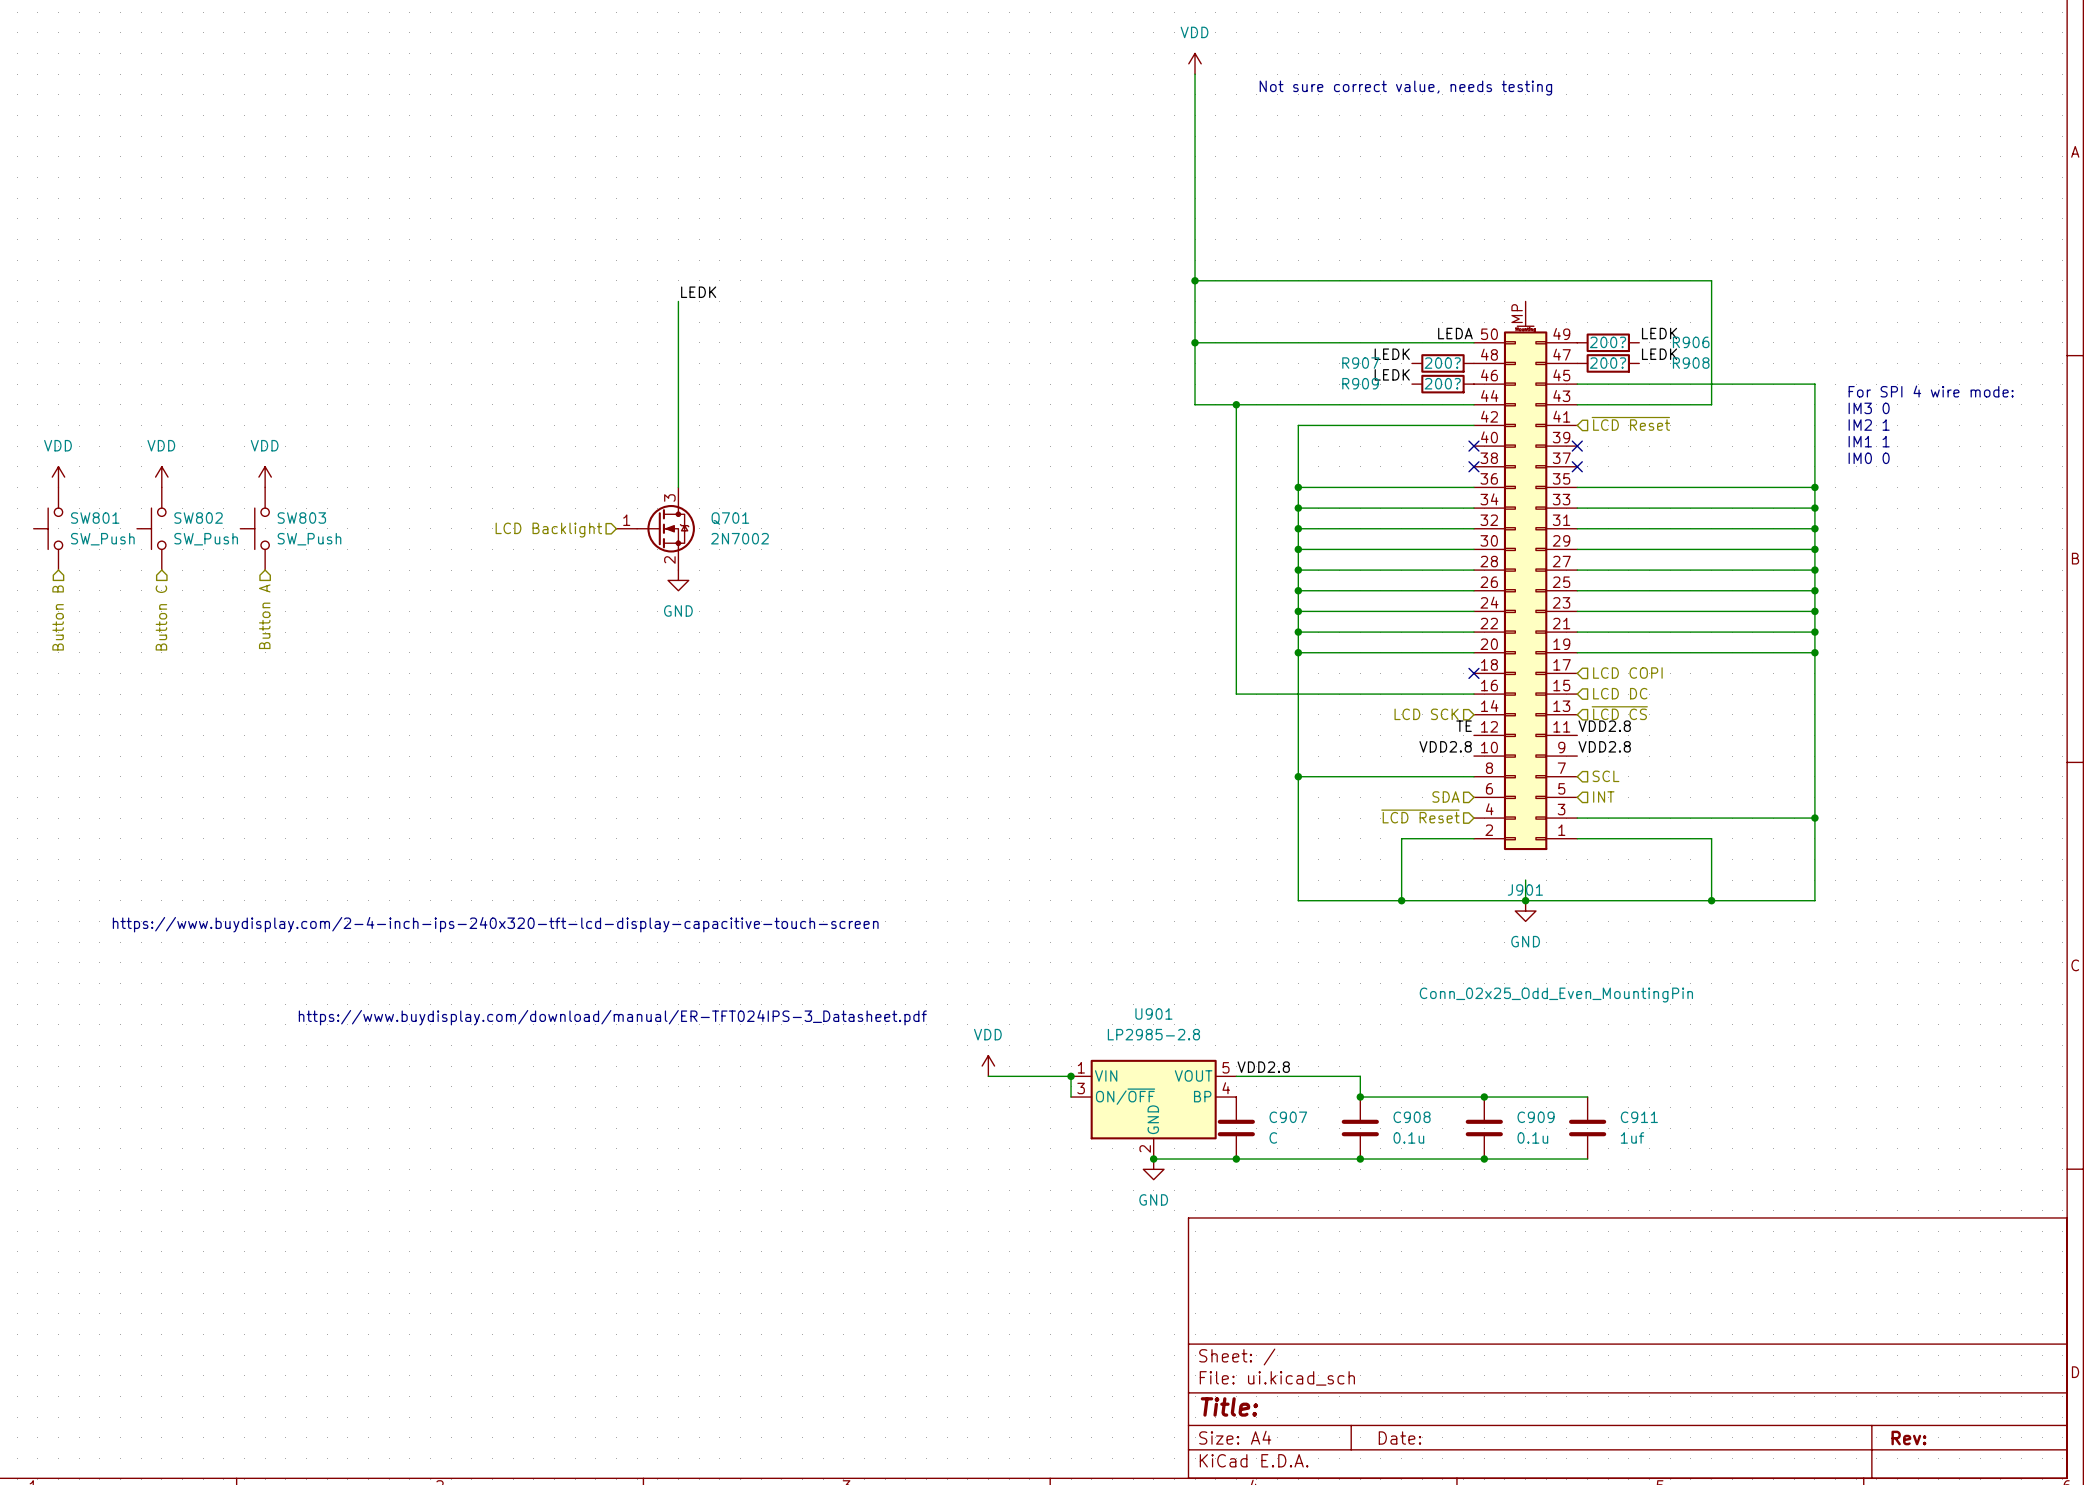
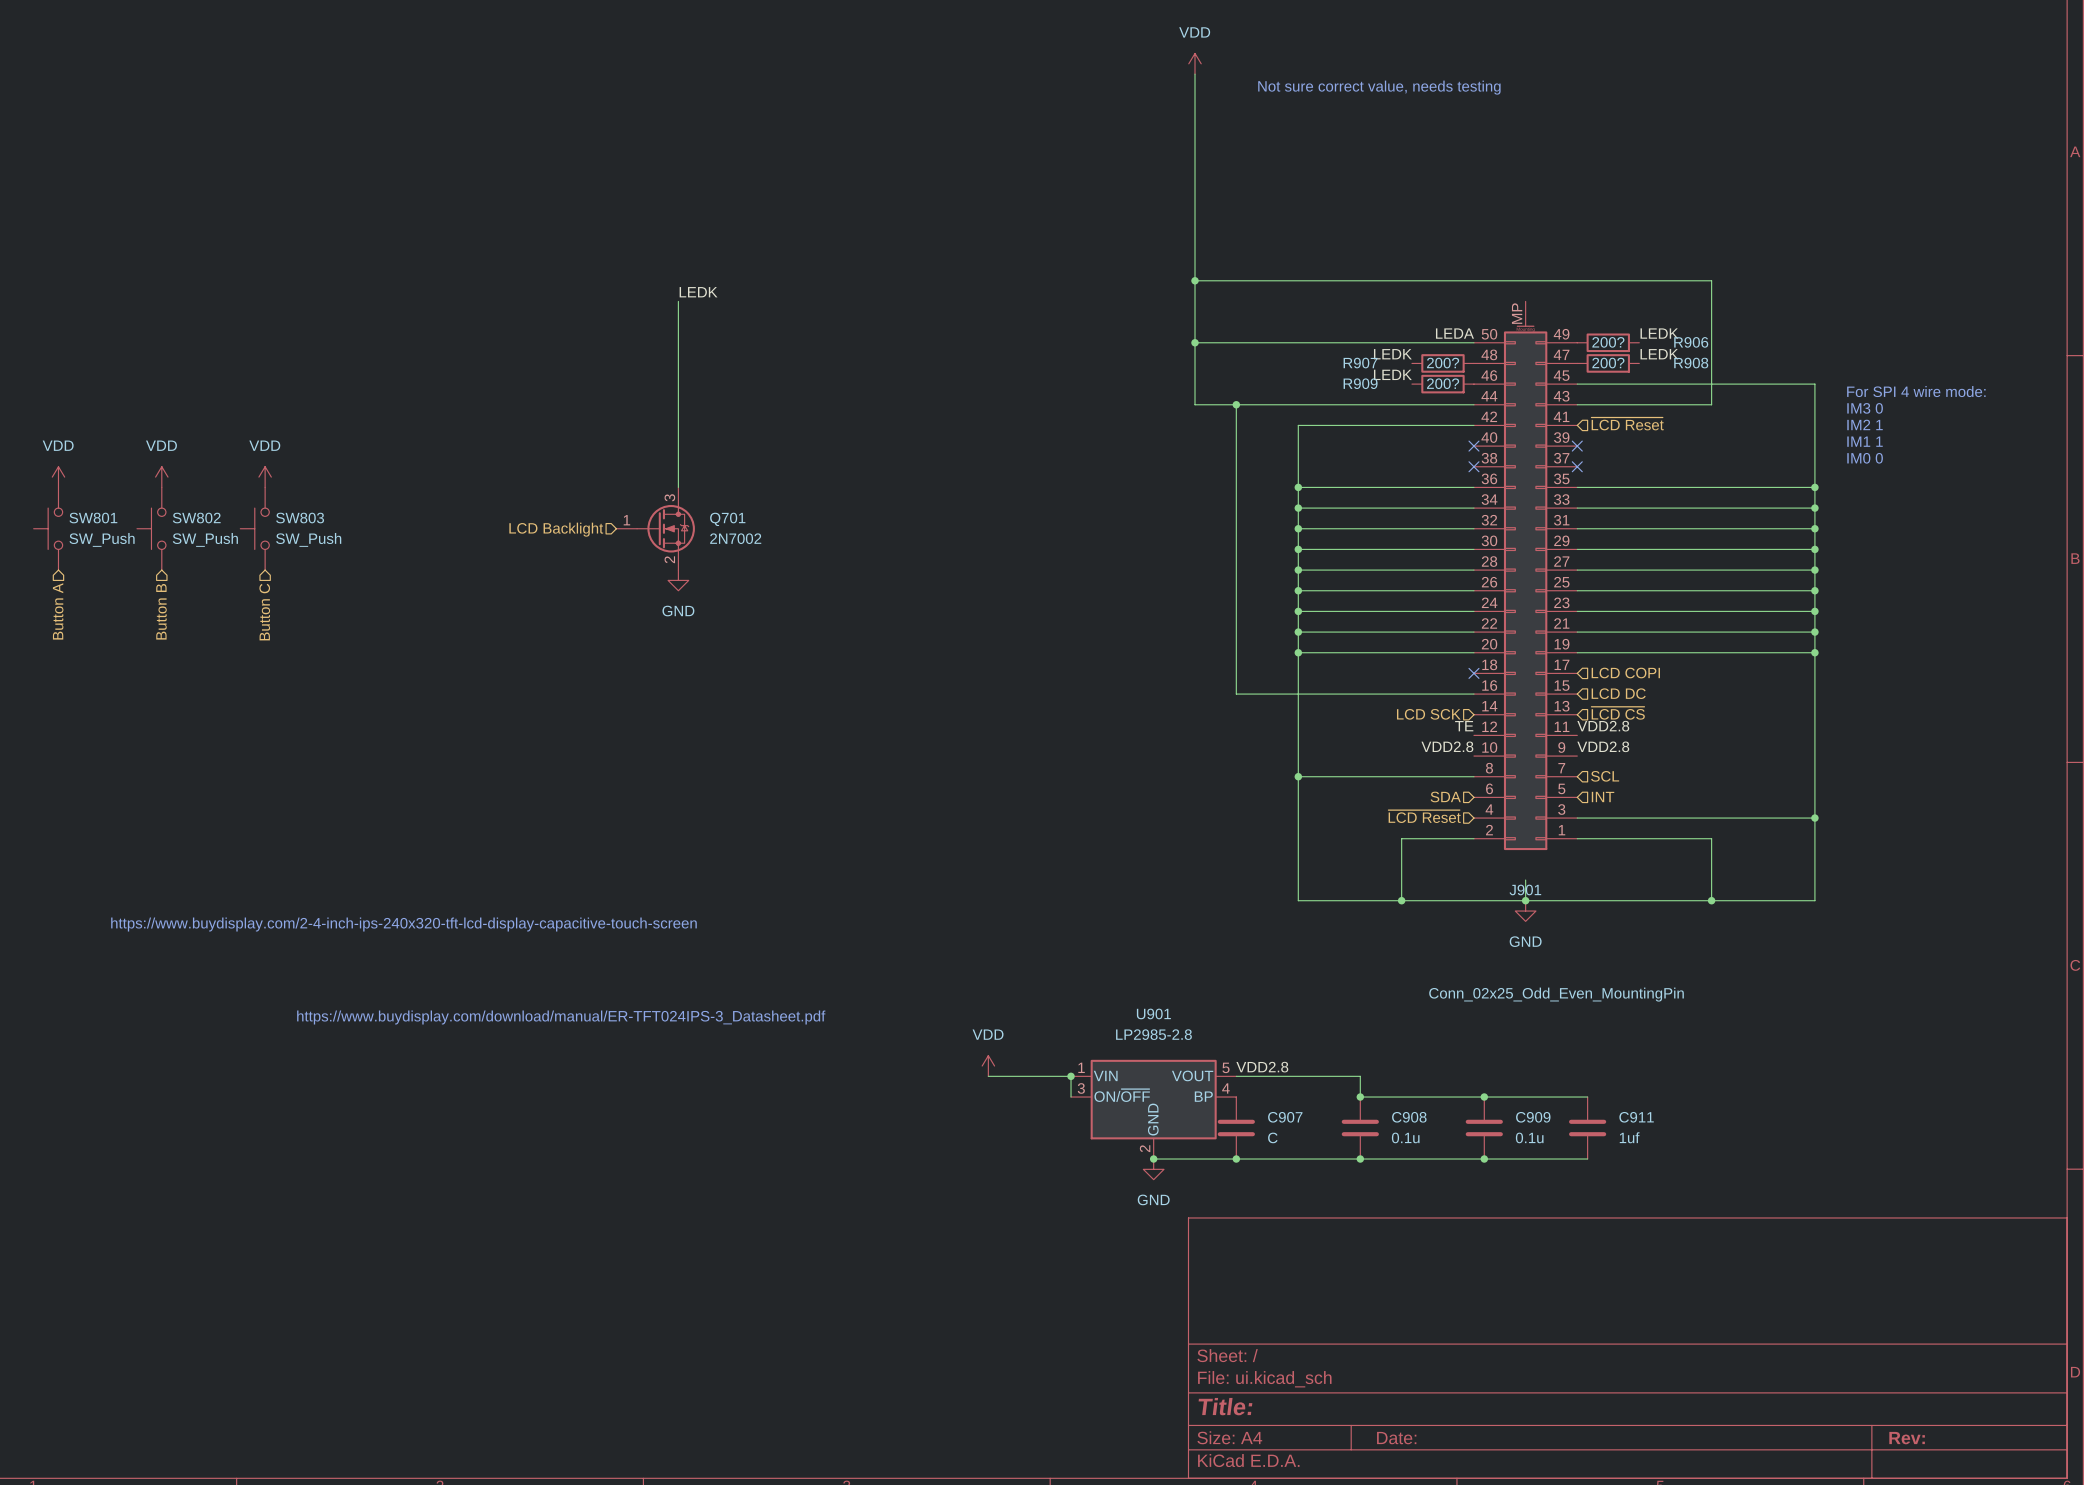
hierarchical label: Button A (264, 616) -> Button C (264, 612)
hierarchical label: Button B (58, 617) -> Button A (58, 611)
hierarchical label: Button C (161, 617) -> Button B (161, 611)

